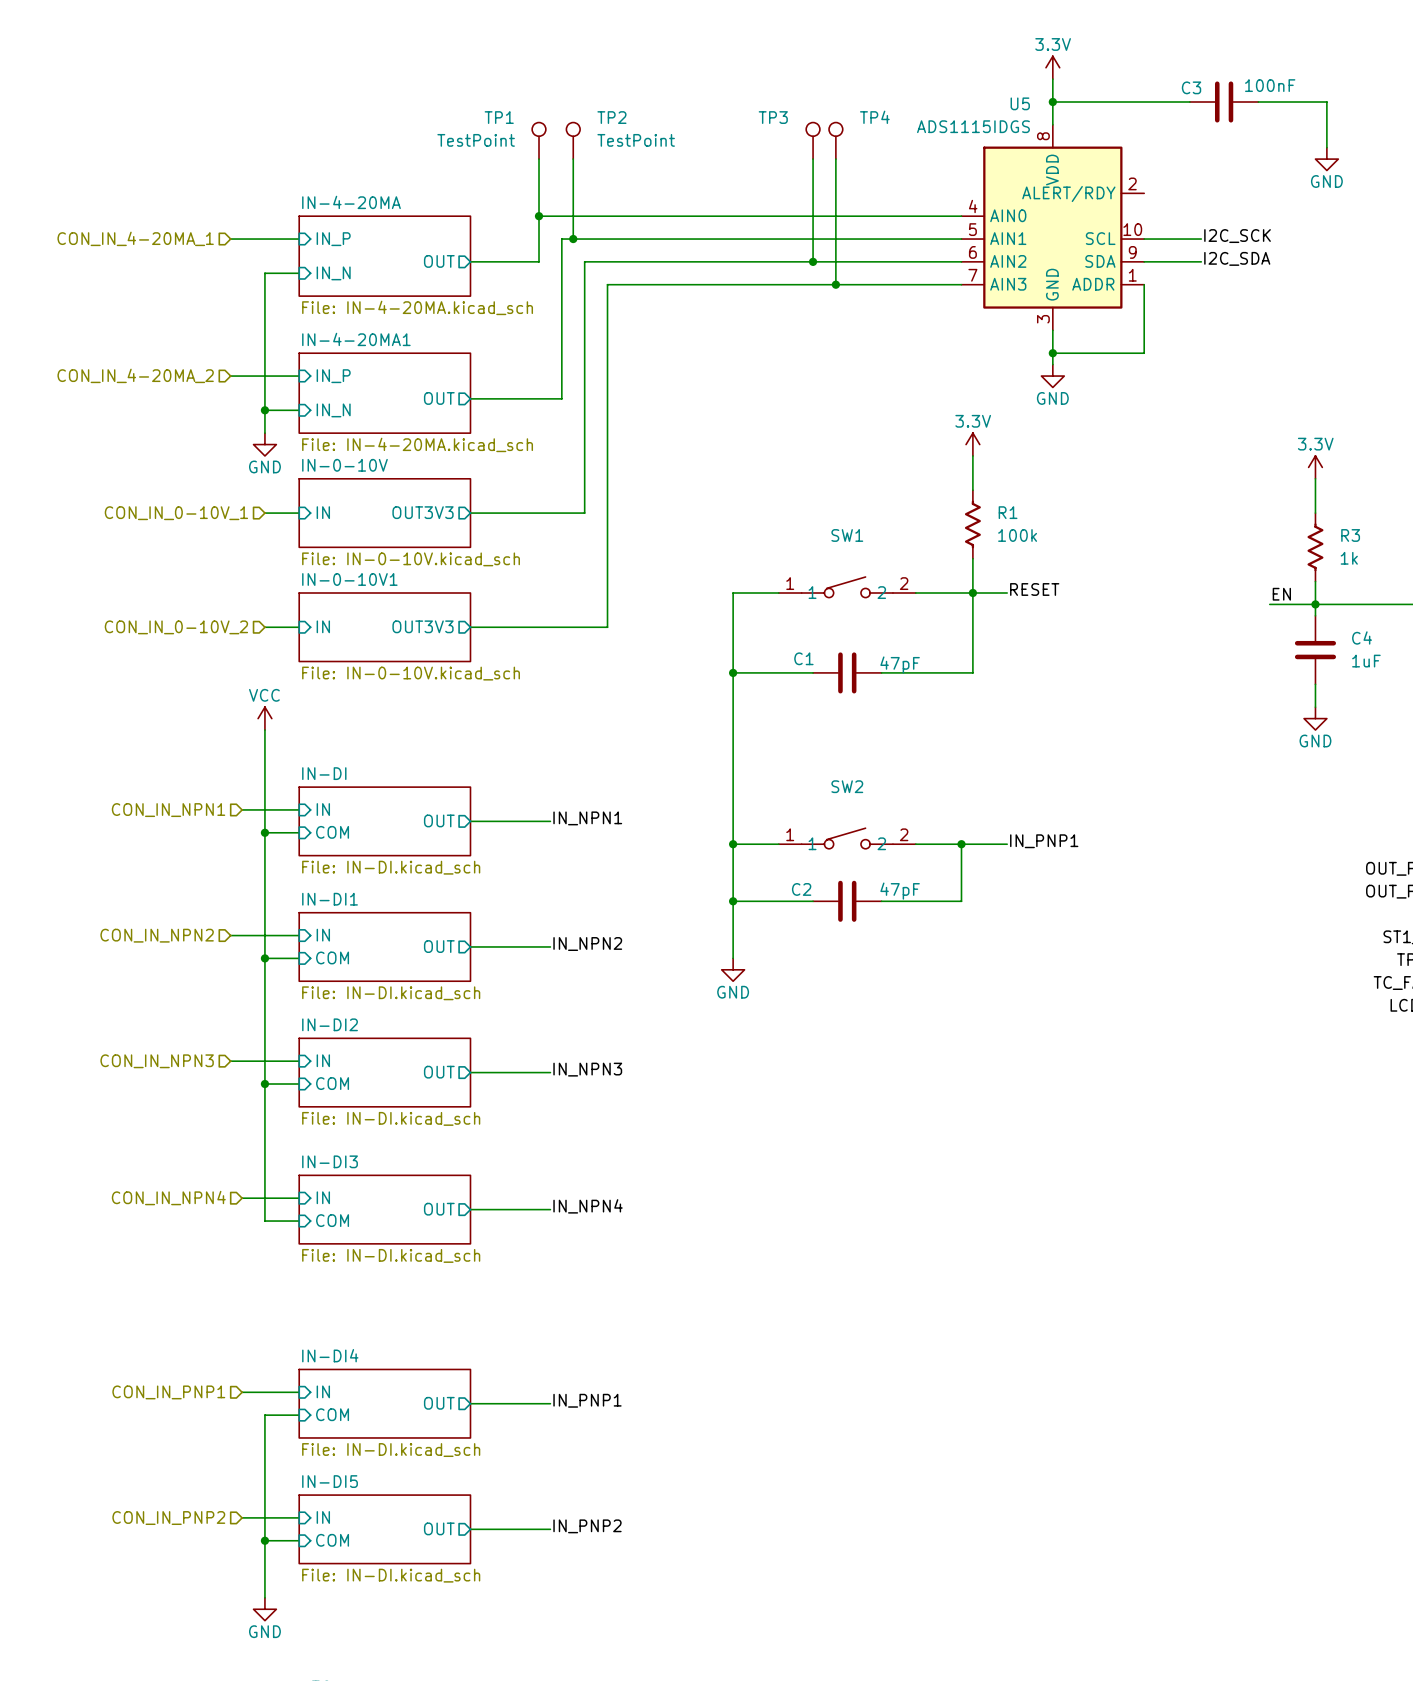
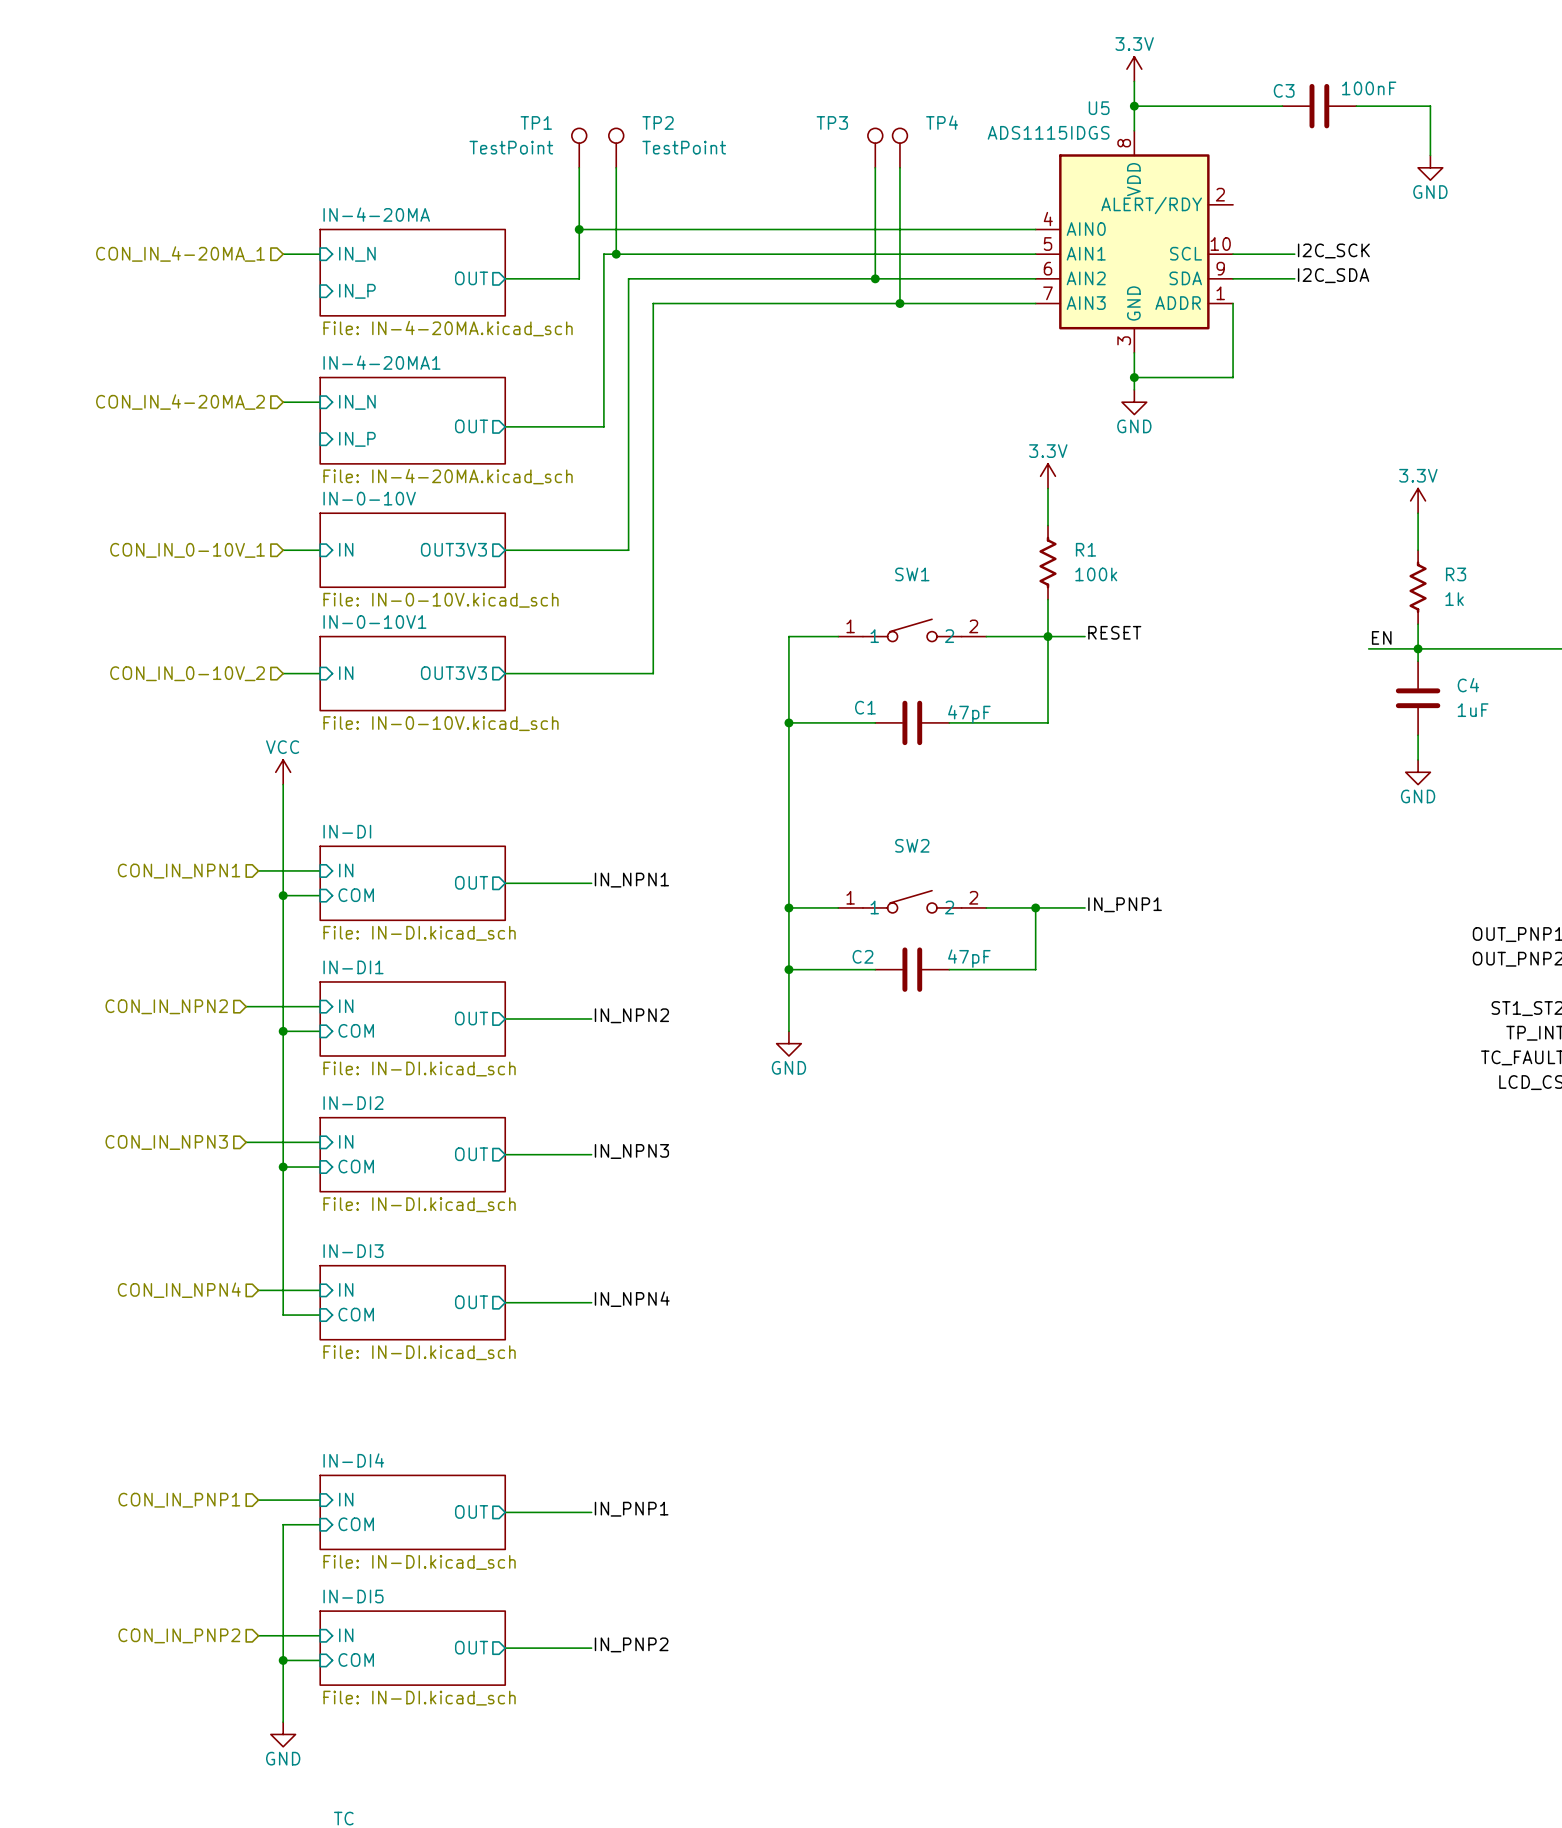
hierarchical label position: CON_IN_4-20MA_1 (135, 238) -> CON_IN_4-20MA_1 (180, 254)
wire: (230, 239) (264, 239) -> none
sheet pin: IN_P (333, 239) -> IN_N (357, 254)
wire: (299, 273) (264, 273) (264, 433) -> none
sheet pin: IN_N (333, 273) -> IN_P (357, 291)
hierarchical label position: CON_IN_4-20MA_2 (135, 375) -> CON_IN_4-20MA_2 (180, 402)
wire: (230, 376) (264, 376) -> none
sheet pin: IN_P (333, 376) -> IN_N (357, 402)
wire: (264, 410) (299, 410) -> none
junction: (264, 410) -> none
sheet pin: IN_N (333, 410) -> IN_P (357, 439)
power symbol: GND (264, 444) -> none

